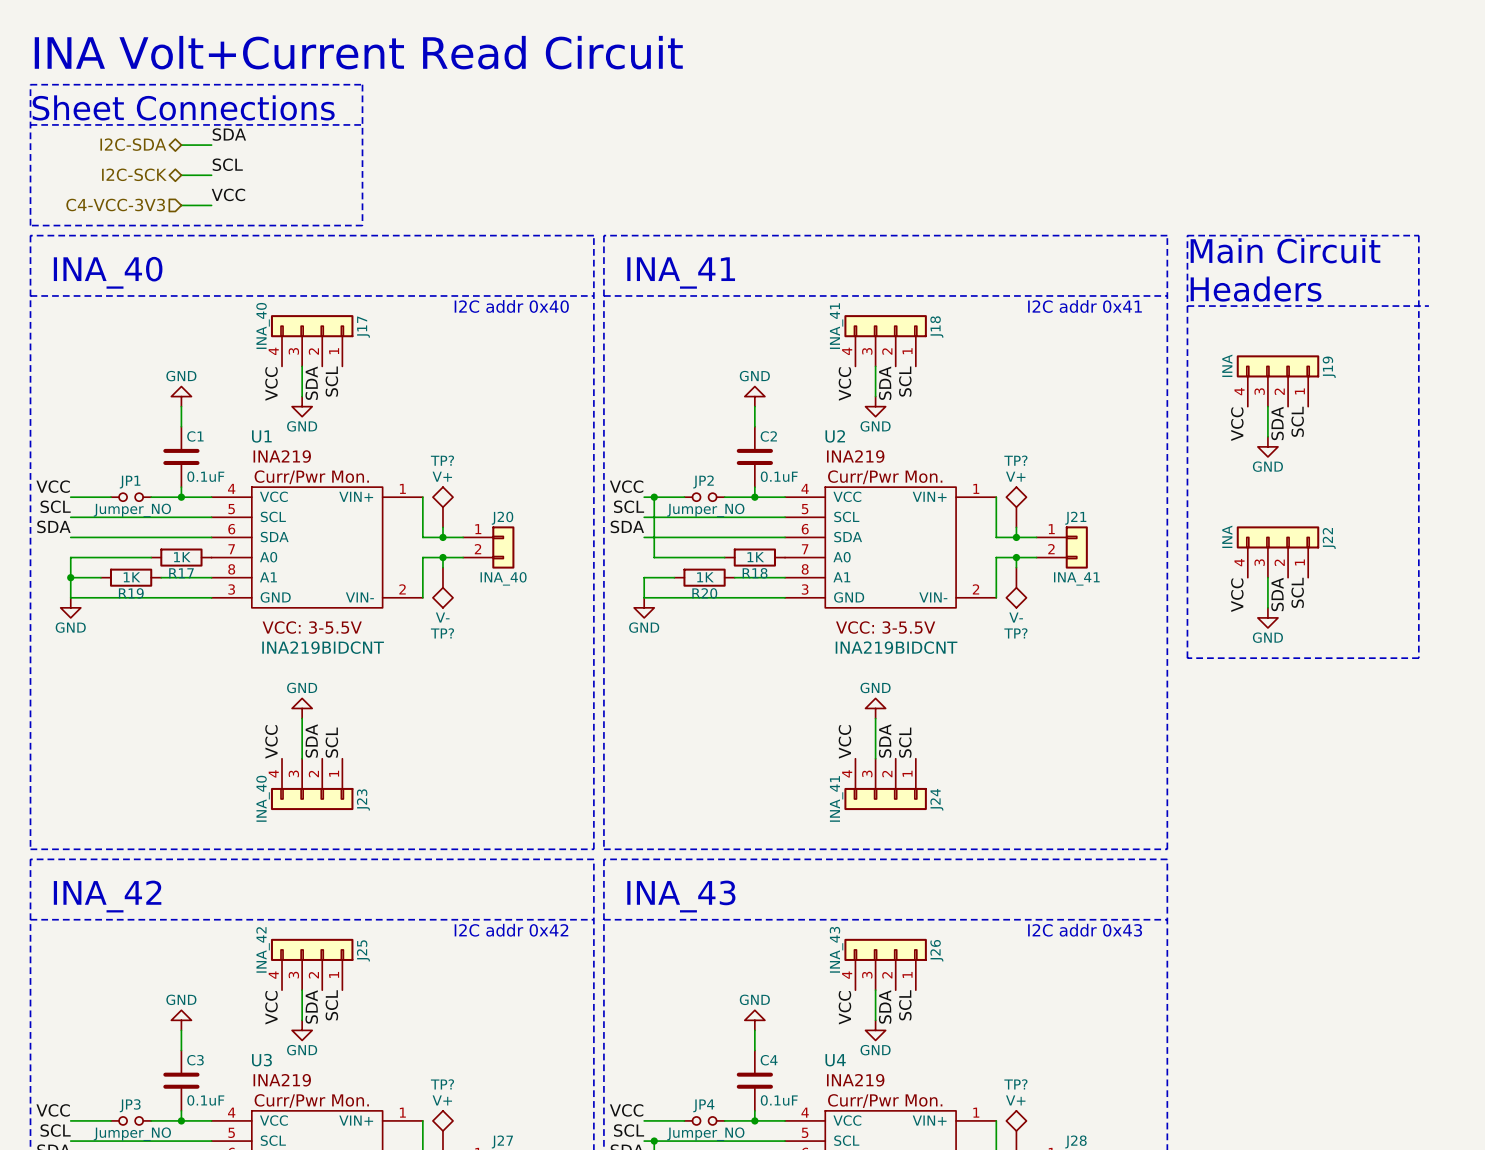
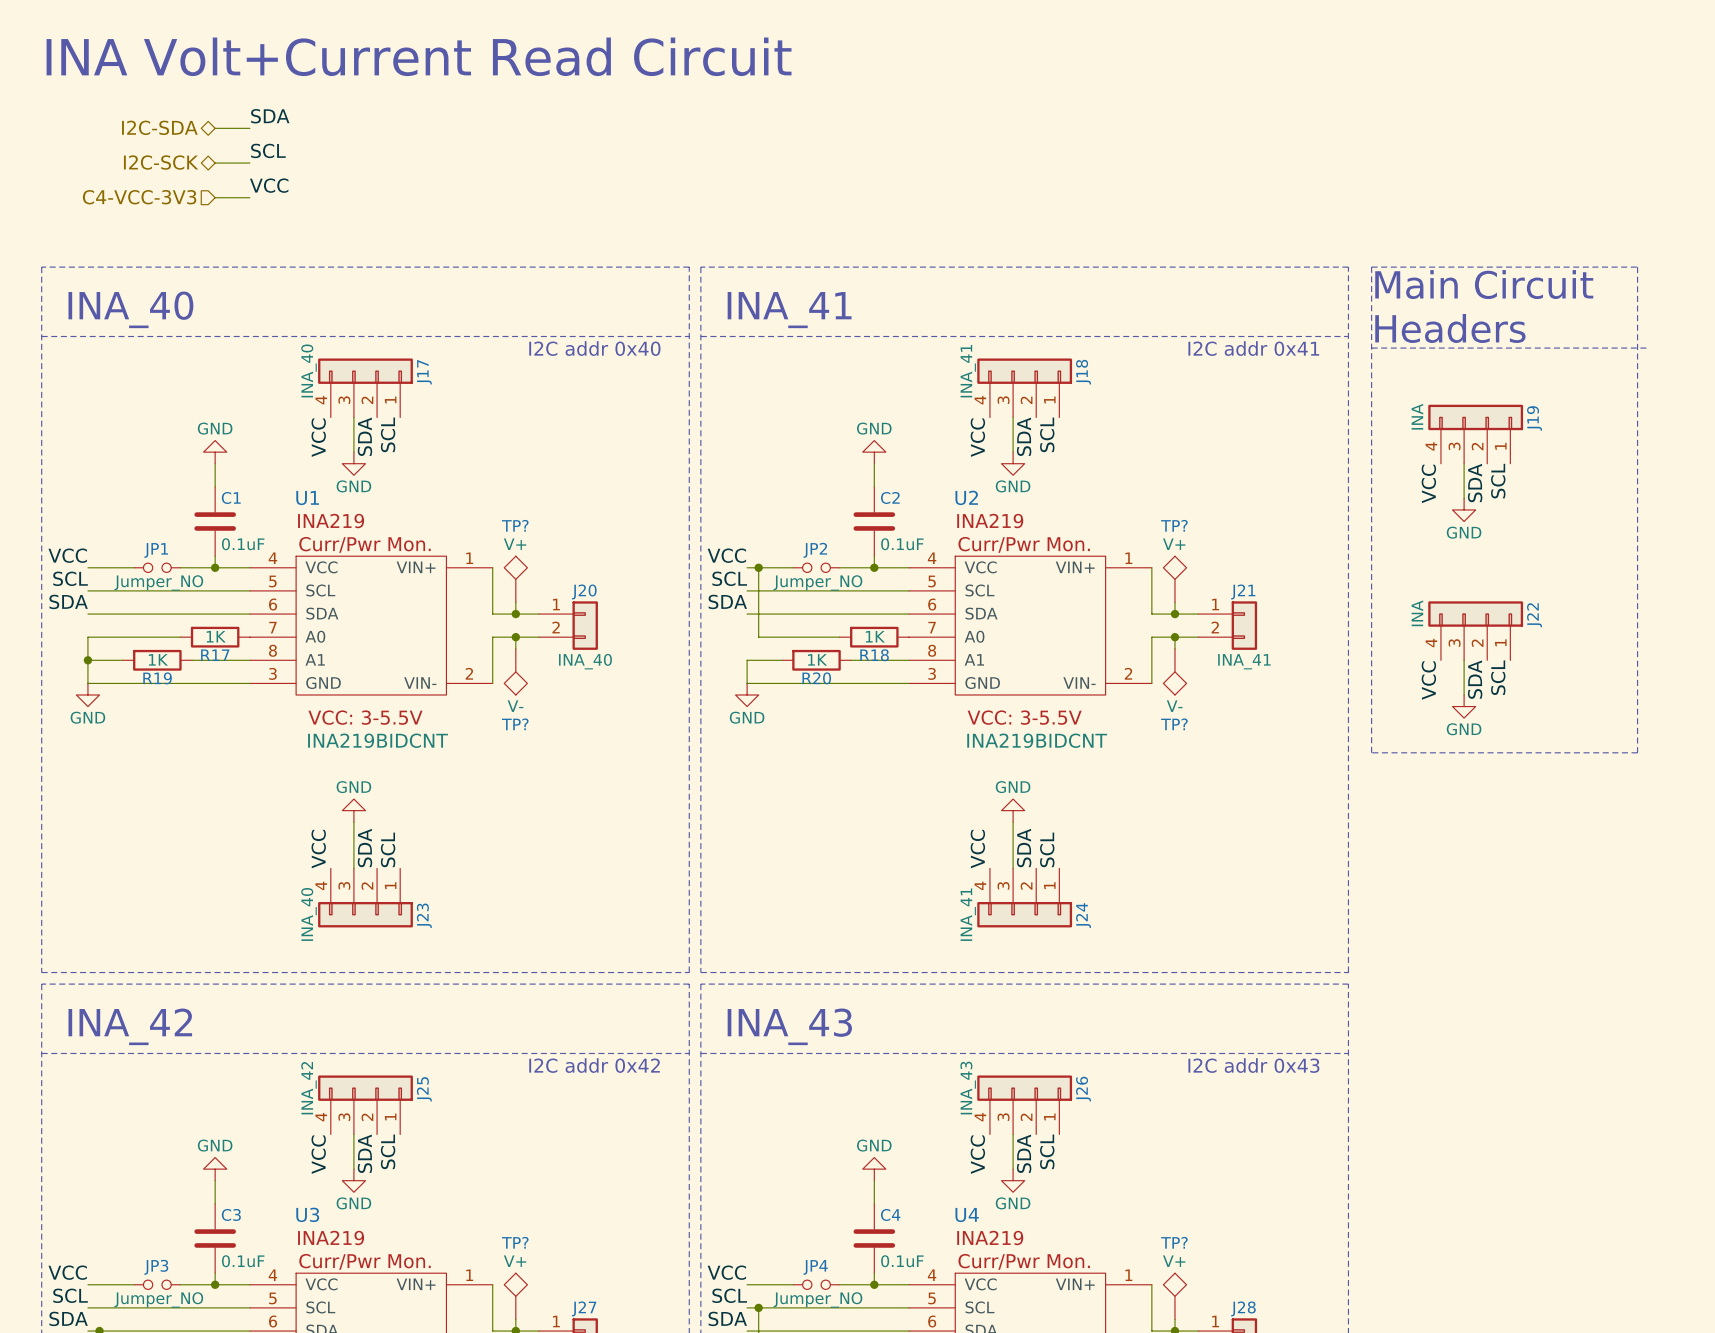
line: (30, 84) (362, 84) (362, 225) (30, 225) (30, 84) -> none
label: none -> SDA (270, 116)
text: Sheet Connections (183, 107) -> none
hierarchical label: none -> I2C-SDA (159, 127)
line: (30, 124) (362, 124) -> none
label: SDA (229, 134) -> SCL (268, 150)
hierarchical label: I2C-SDA (133, 144) -> I2C-SCK (161, 162)
label: SCL (227, 164) -> VCC (269, 185)
hierarchical label shape: bidirectional (134, 174) -> input (139, 197)
hierarchical label: I2C-SCK (134, 174) -> C4-VCC-3V3 (139, 197)
label: VCC (228, 194) -> none
hierarchical label: C4-VCC-3V3 (115, 204) -> none
wire: (181, 205) (211, 205) -> (215, 128) (249, 128)

